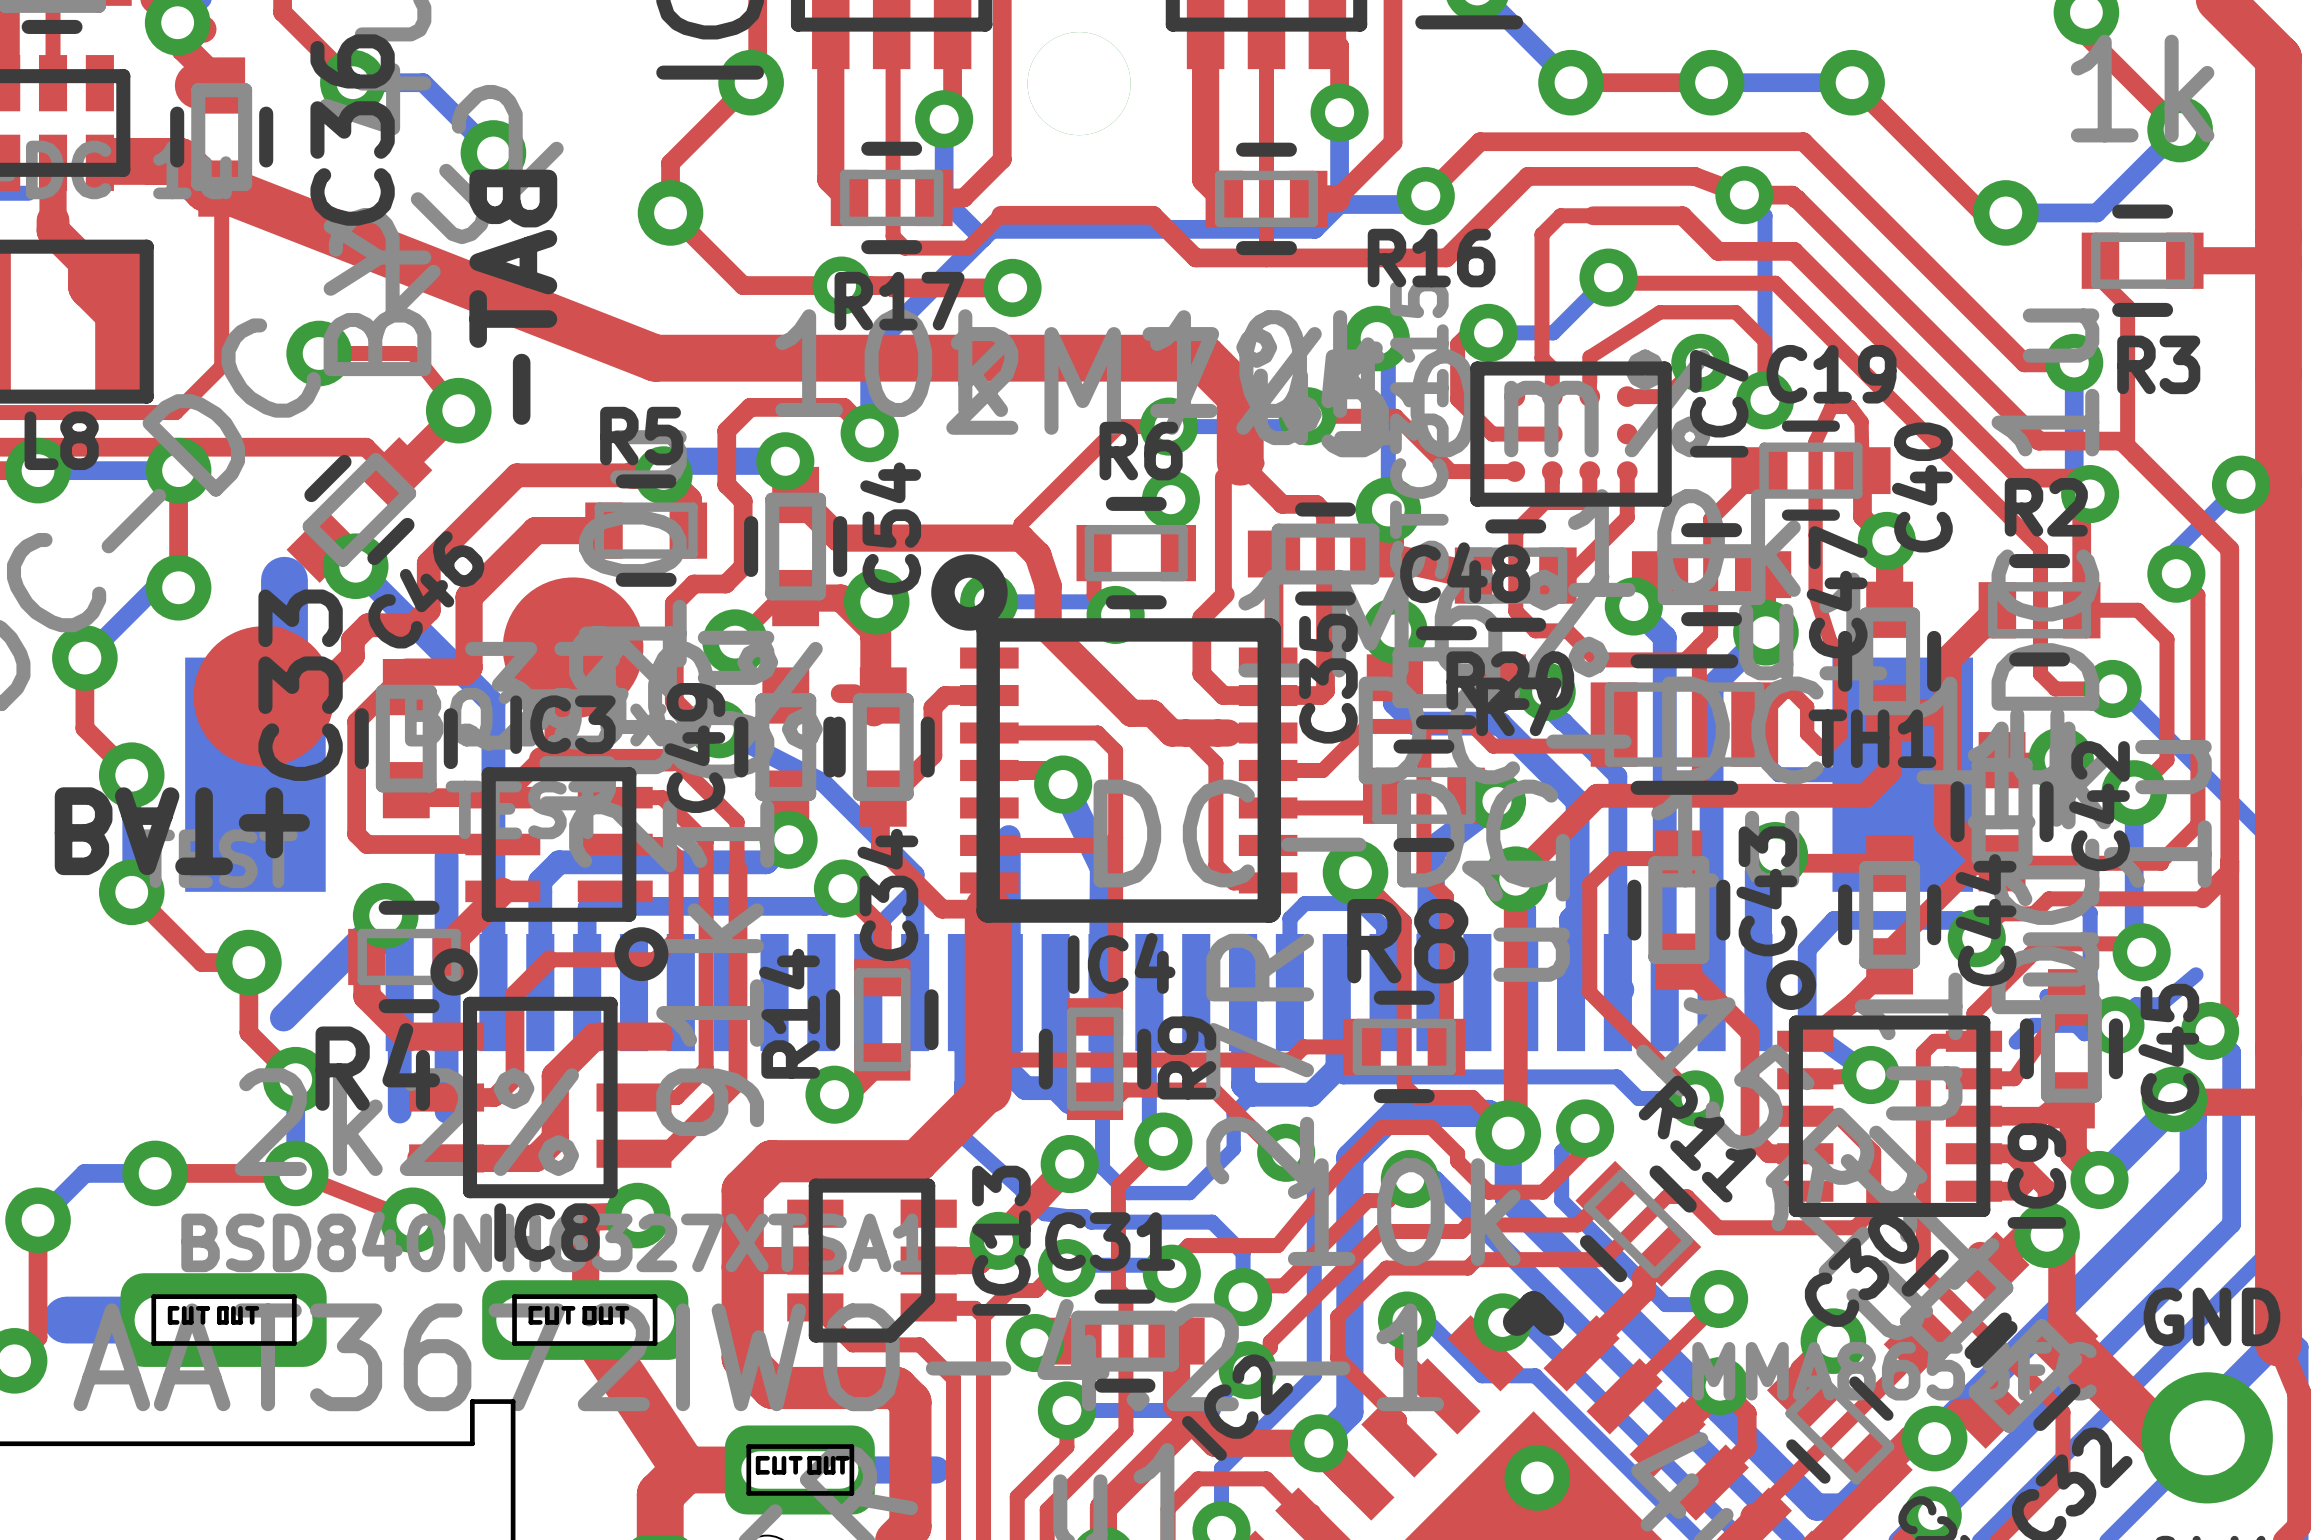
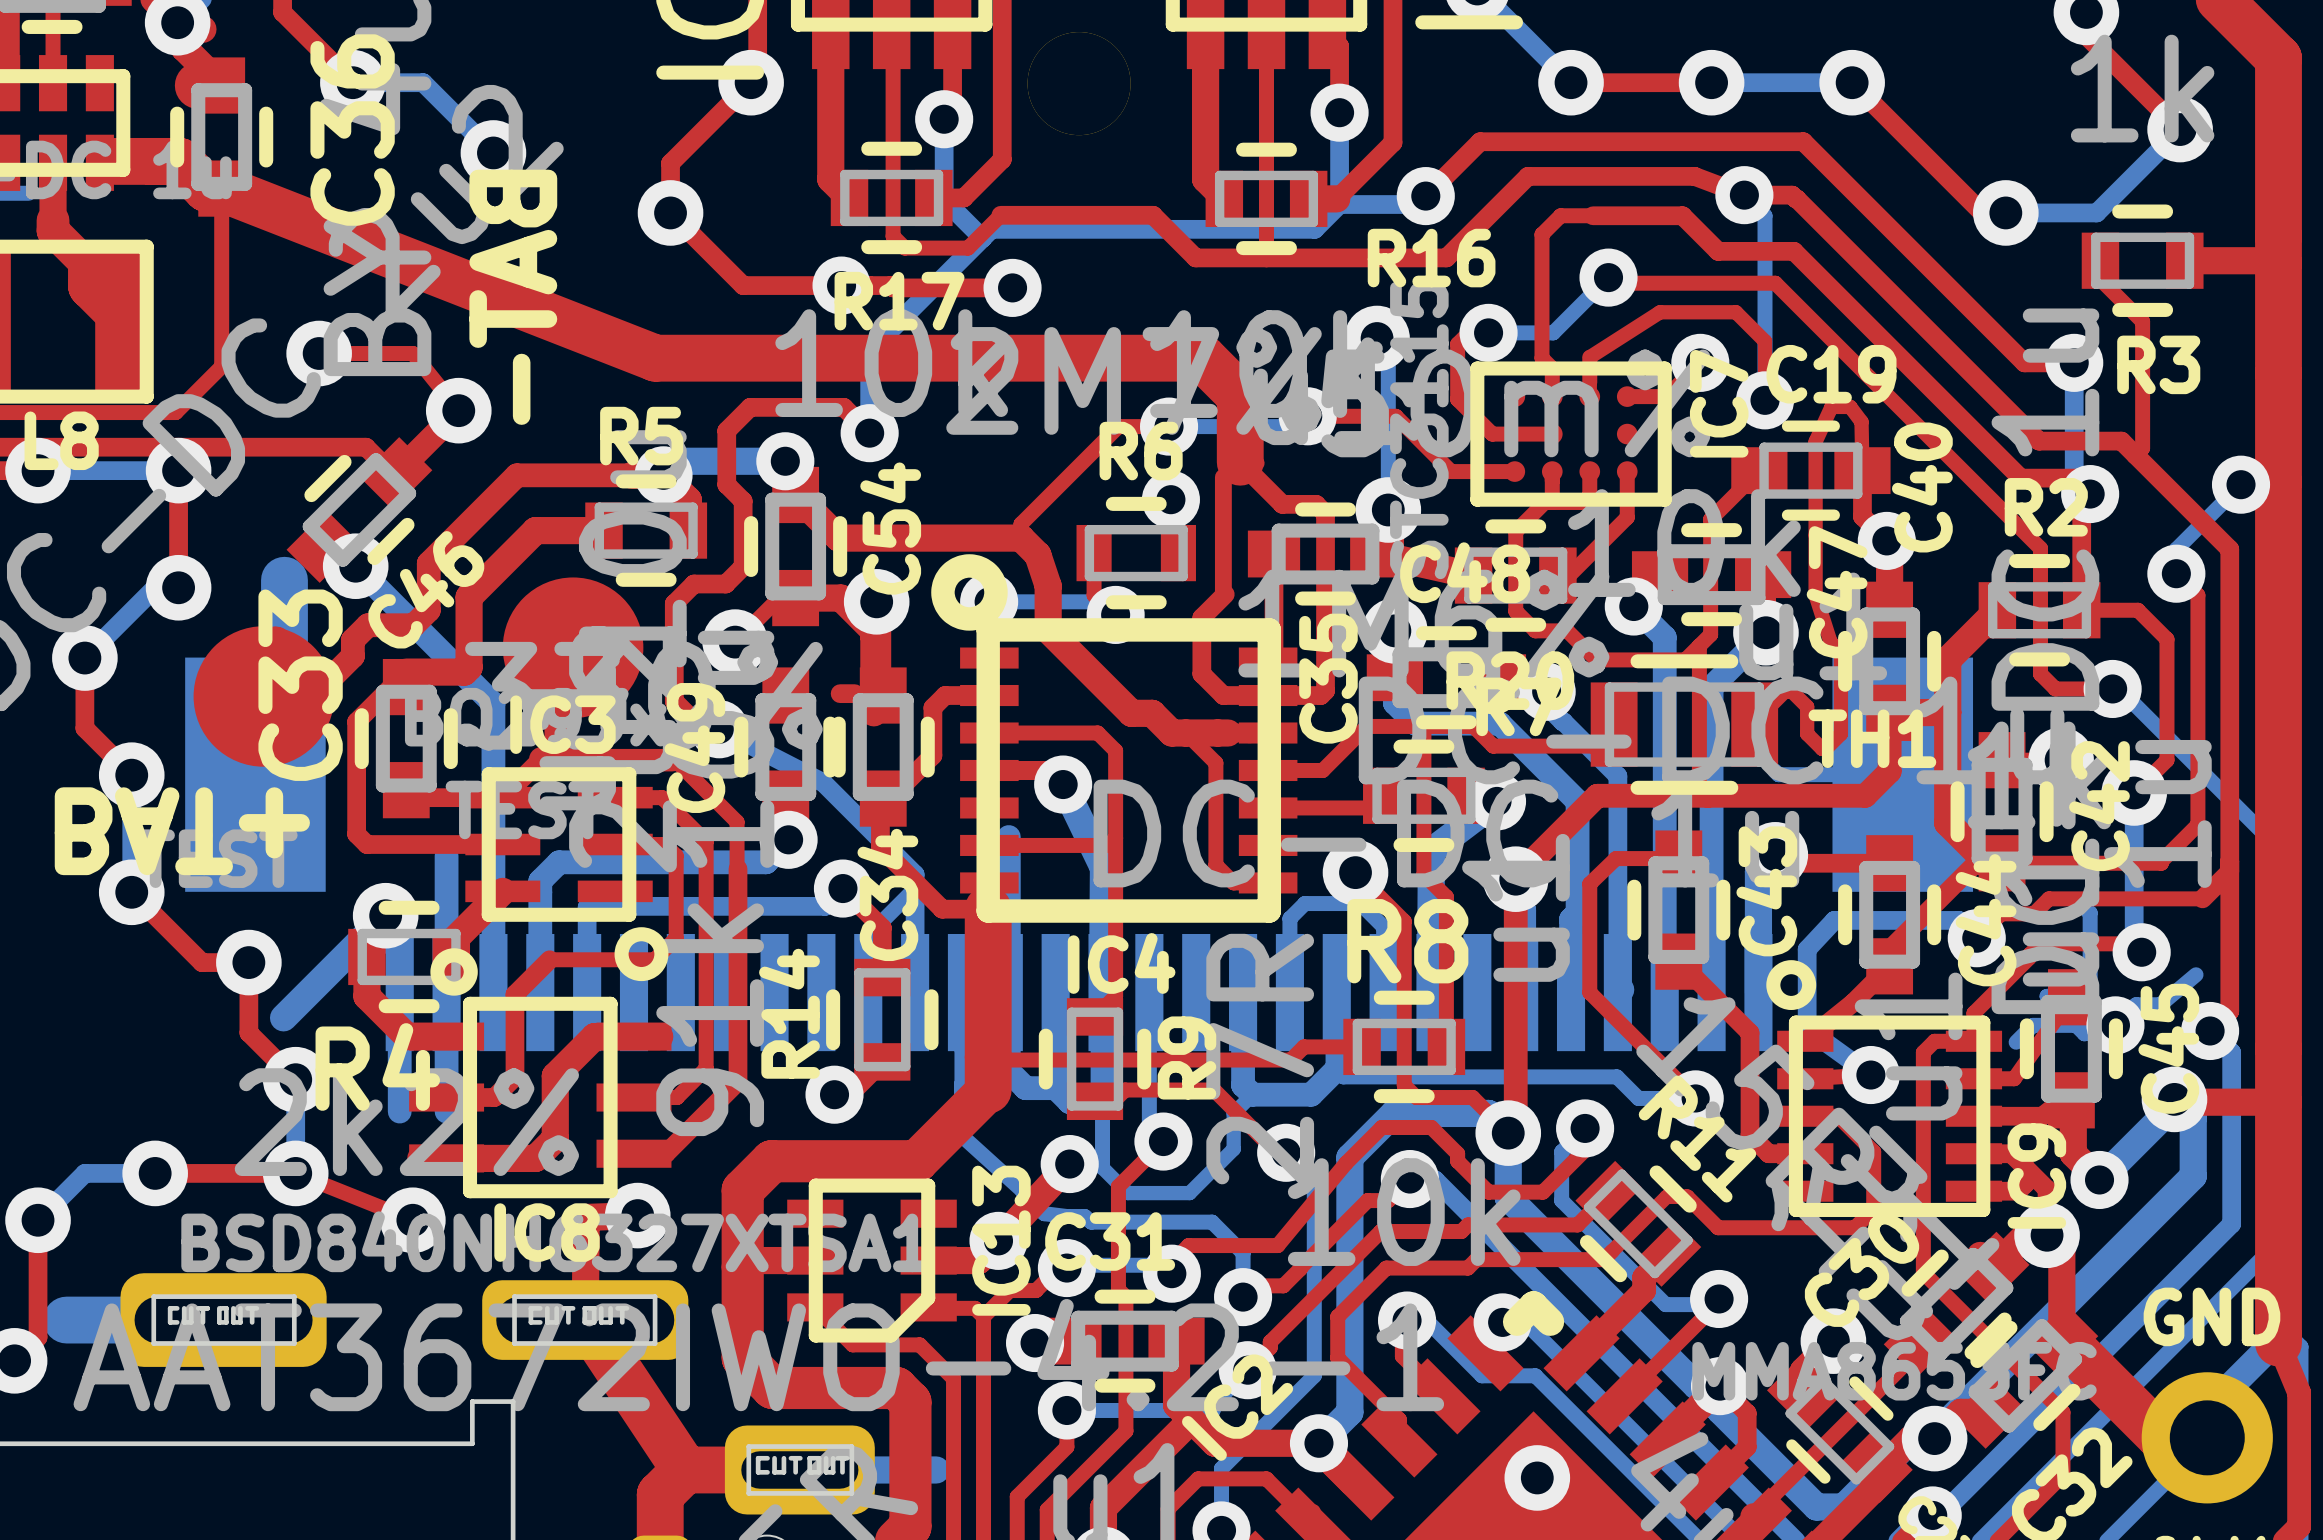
top track: (2127, 306) (2127, 447) (2135, 455) -> (2127, 306) (2142, 321) (2142, 448) (2135, 455)

